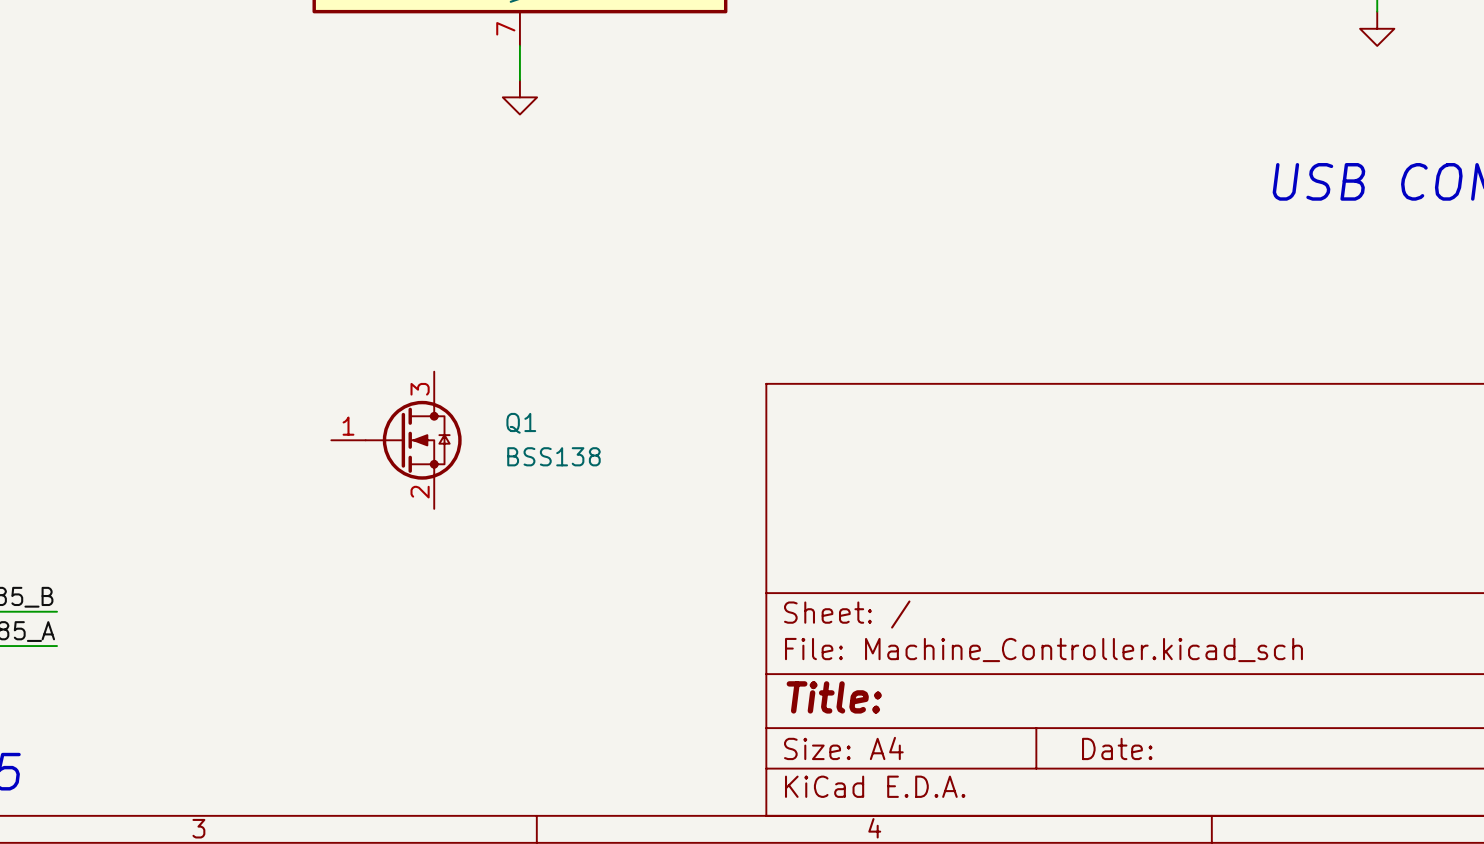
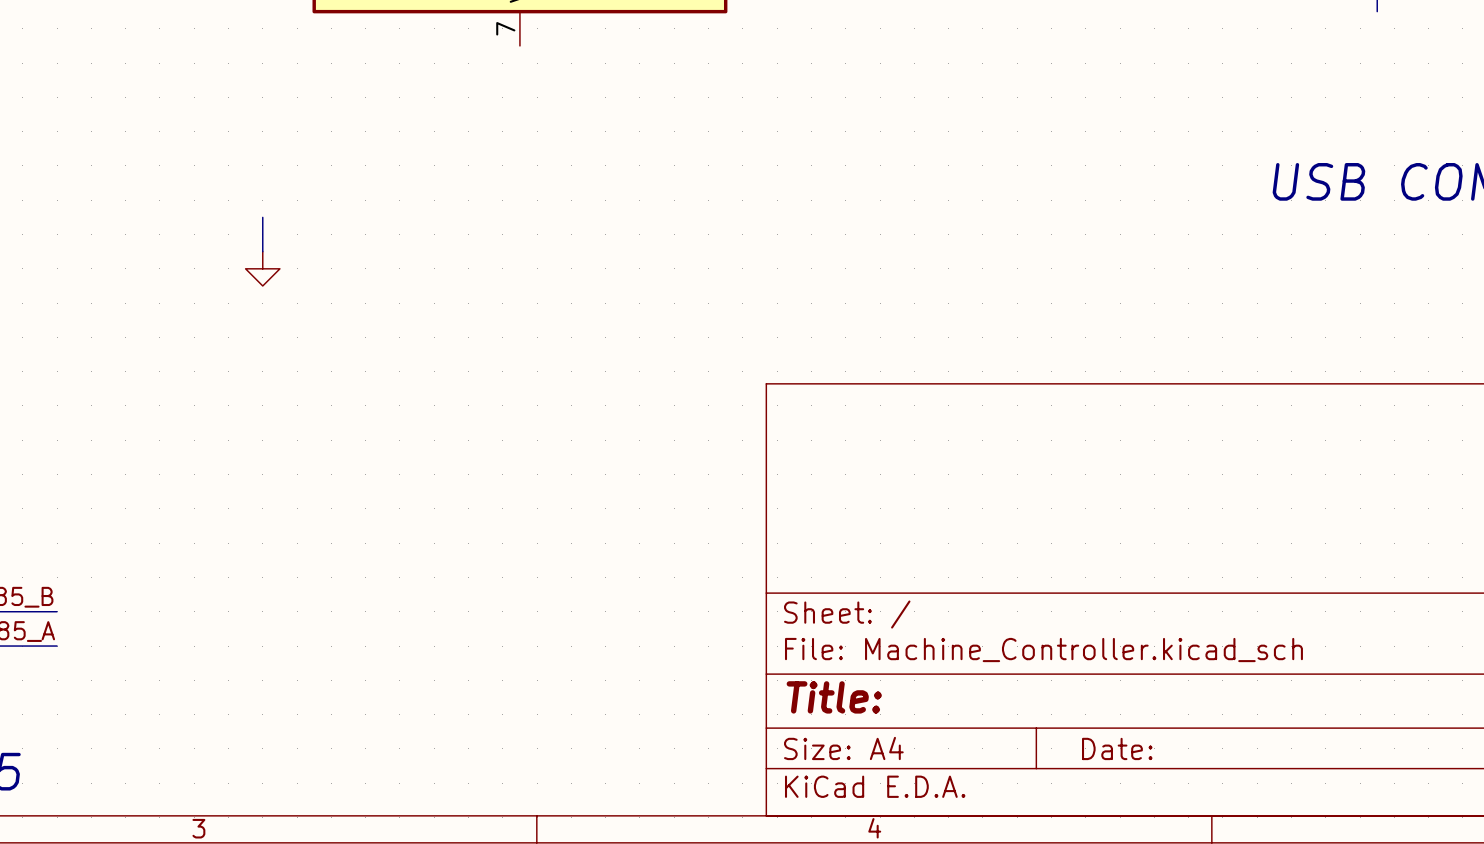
power symbol: (1377, 28) -> none
wire: (519, 45) (519, 80) -> (262, 217) (262, 251)
power symbol: (519, 97) -> none
power symbol: none -> (262, 268)
Q1: BSS138 (396, 440) -> none

